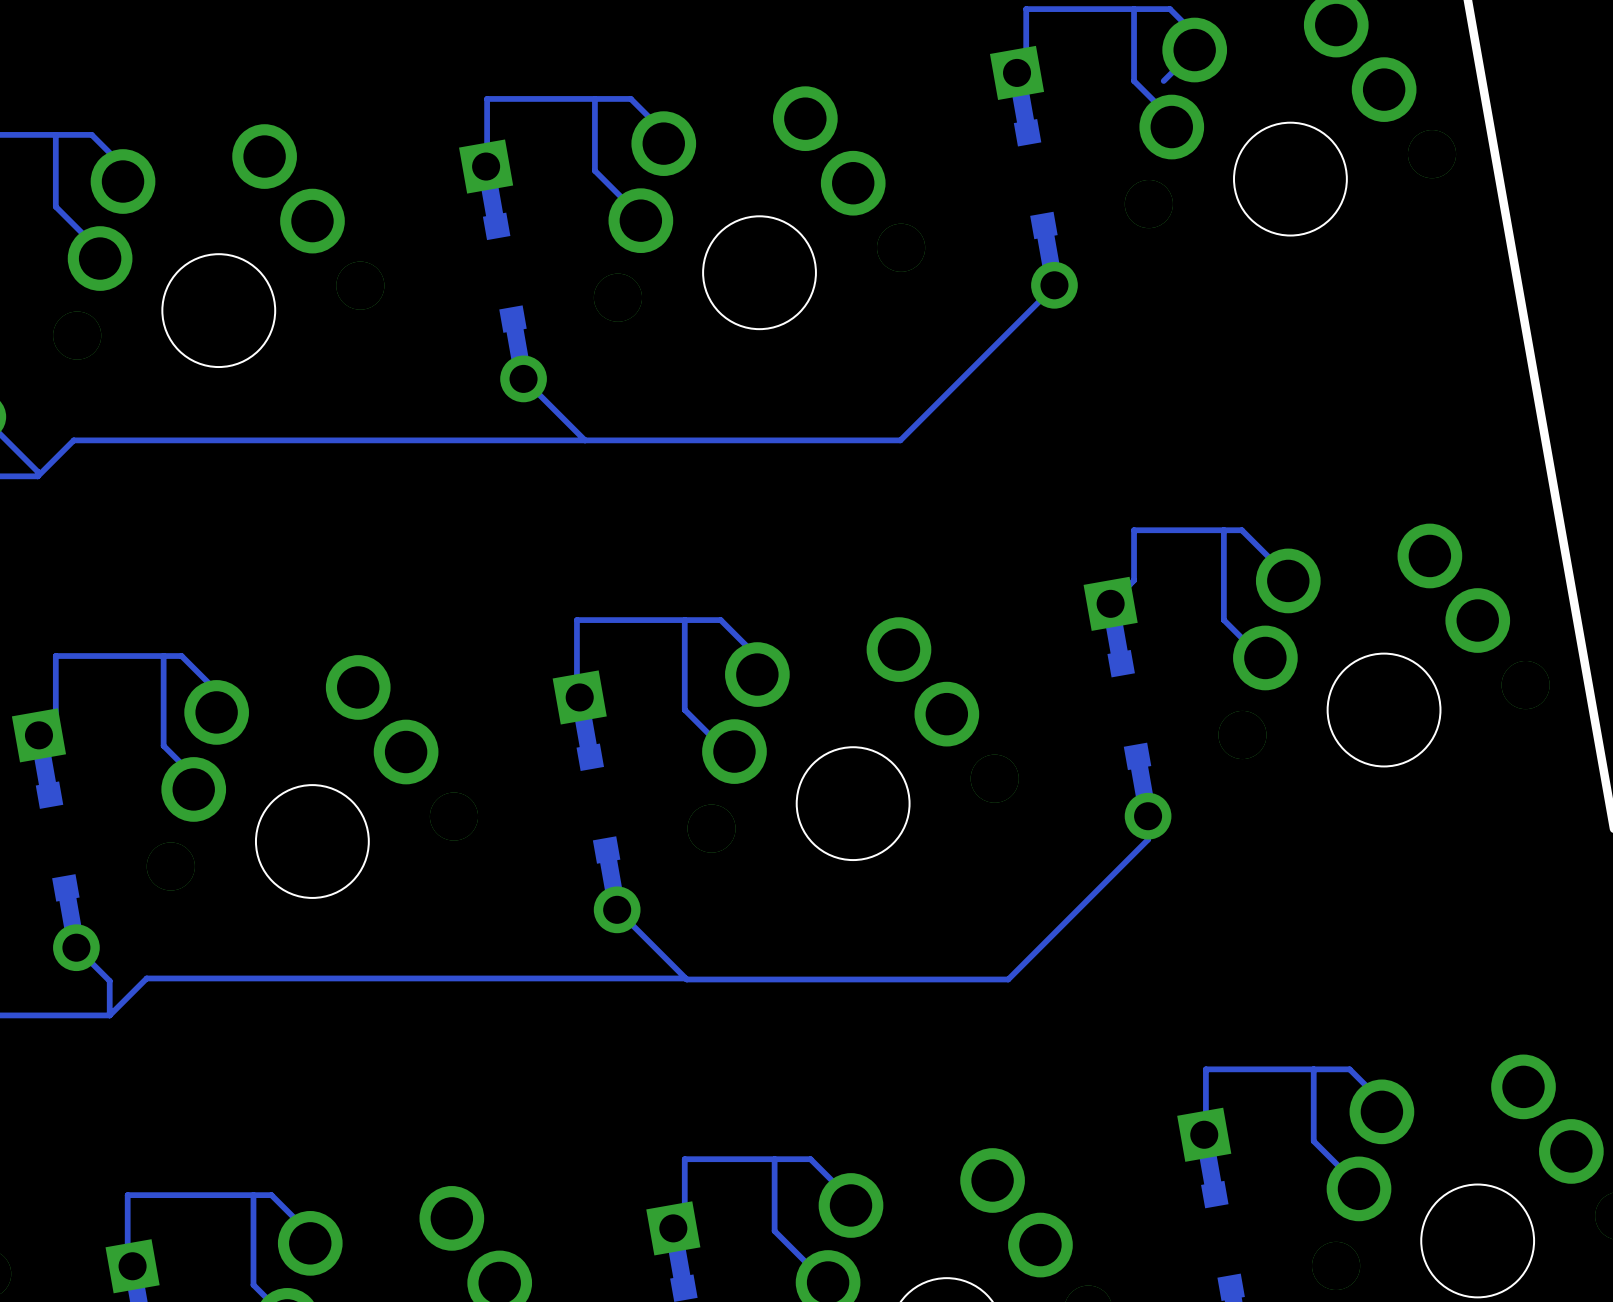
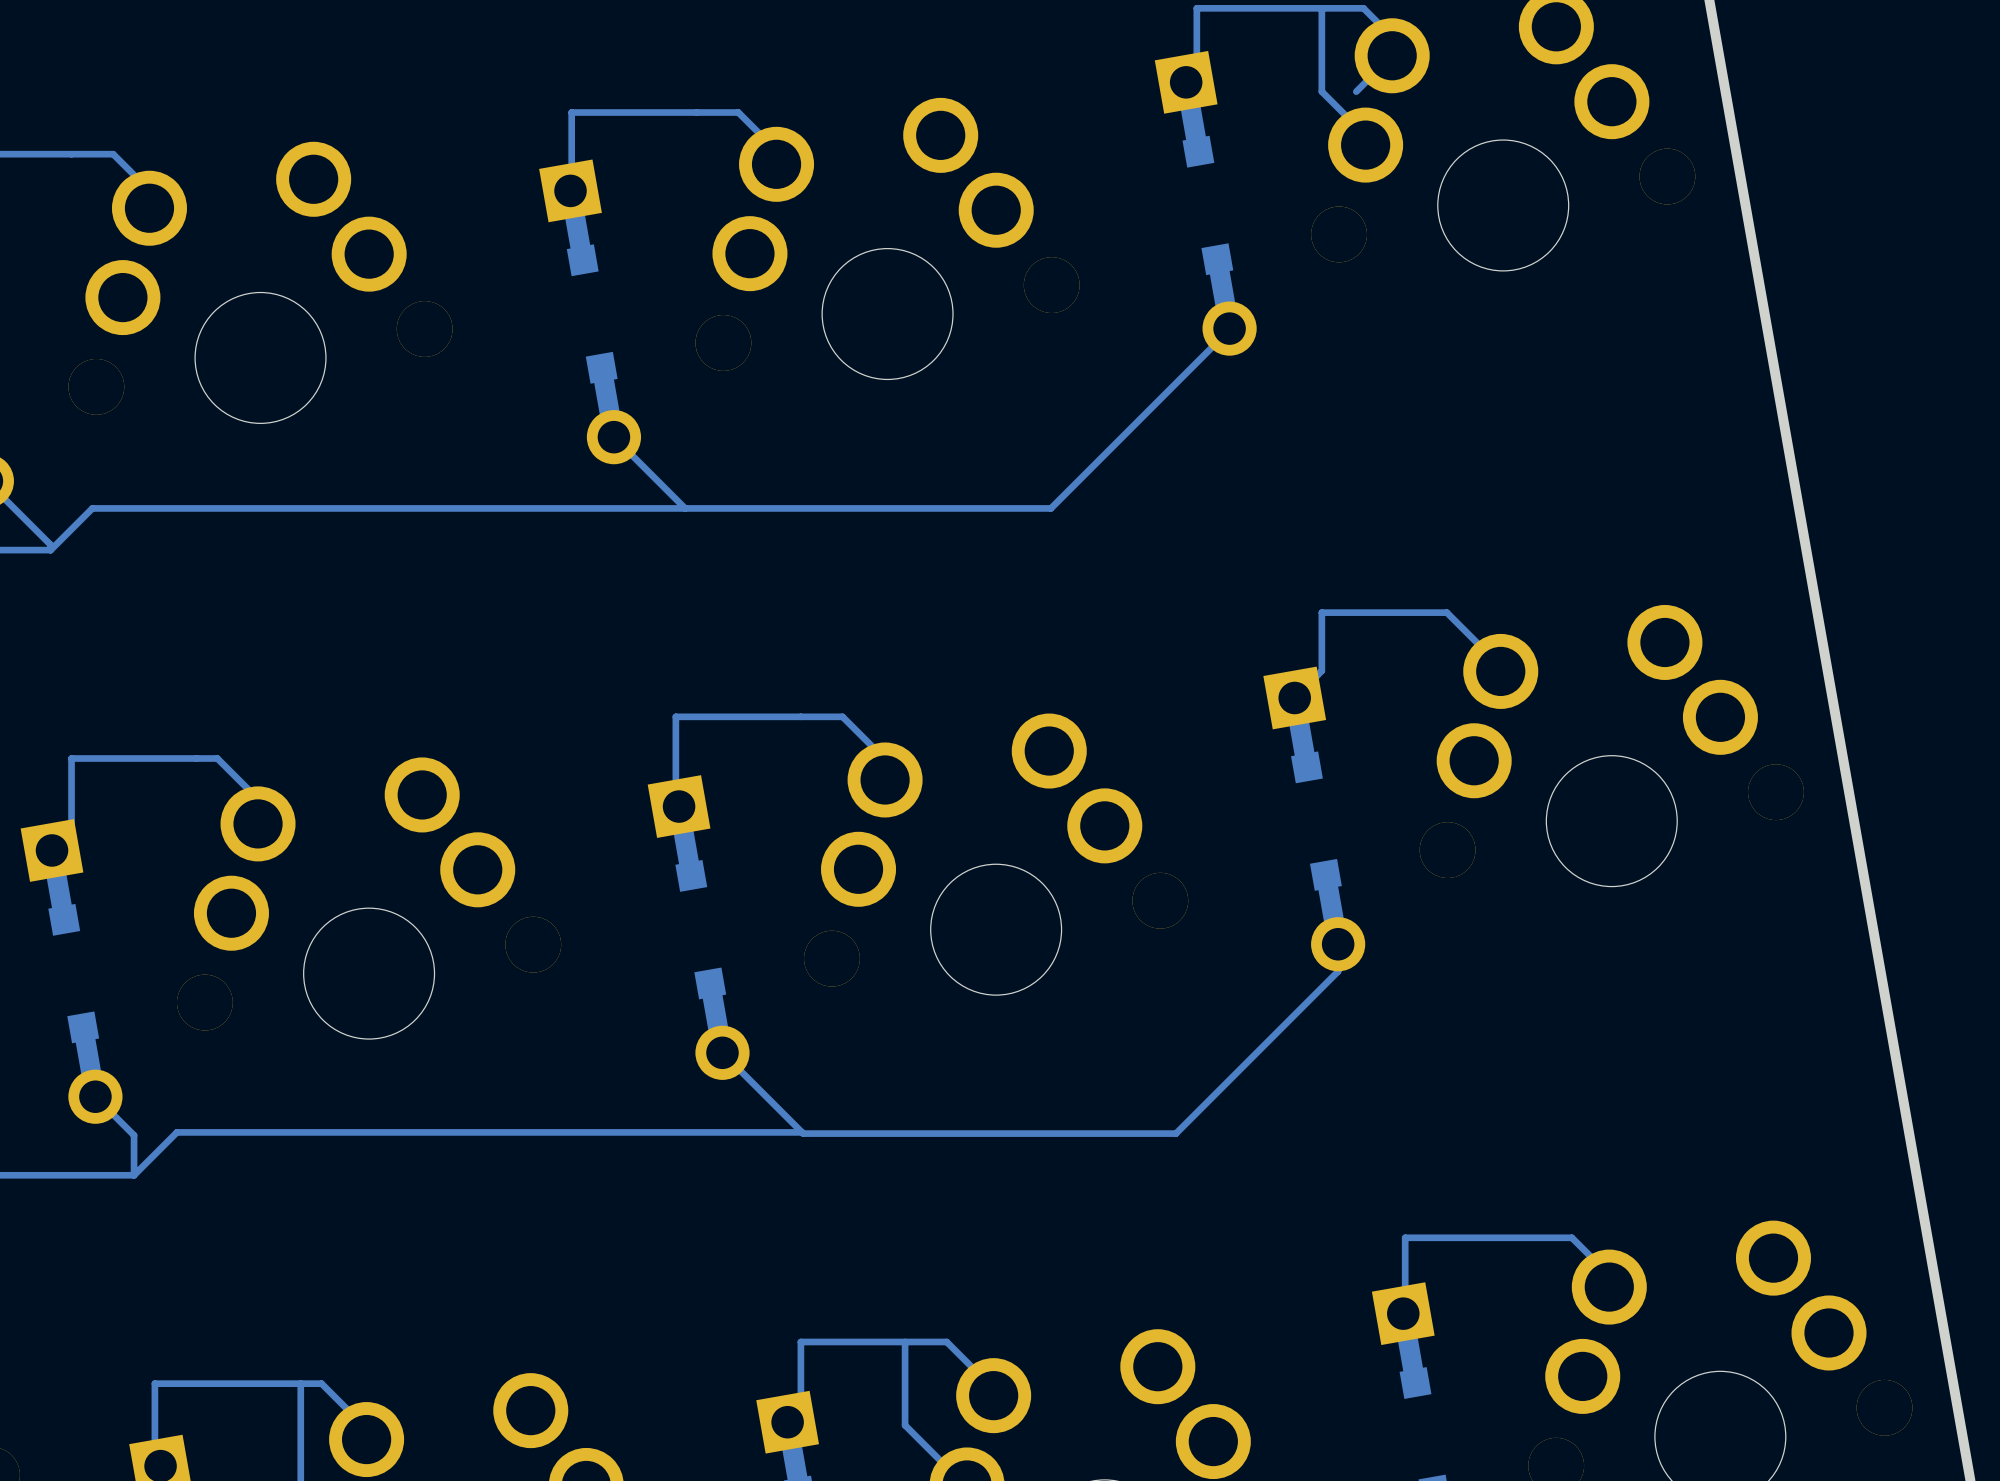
track: (594, 98) (594, 170) (640, 216) (640, 220) -> none
track: (55, 134) (55, 206) (100, 251) (100, 258) -> none
track: (1223, 530) (1223, 620) (1261, 657) (1265, 657) -> none
track: (684, 620) (684, 709) (726, 751) (734, 751) -> none
track: (163, 656) (163, 745) (193, 775) (193, 789) -> none
track: (1313, 1069) (1313, 1141) (1359, 1186) (1359, 1188) -> none

